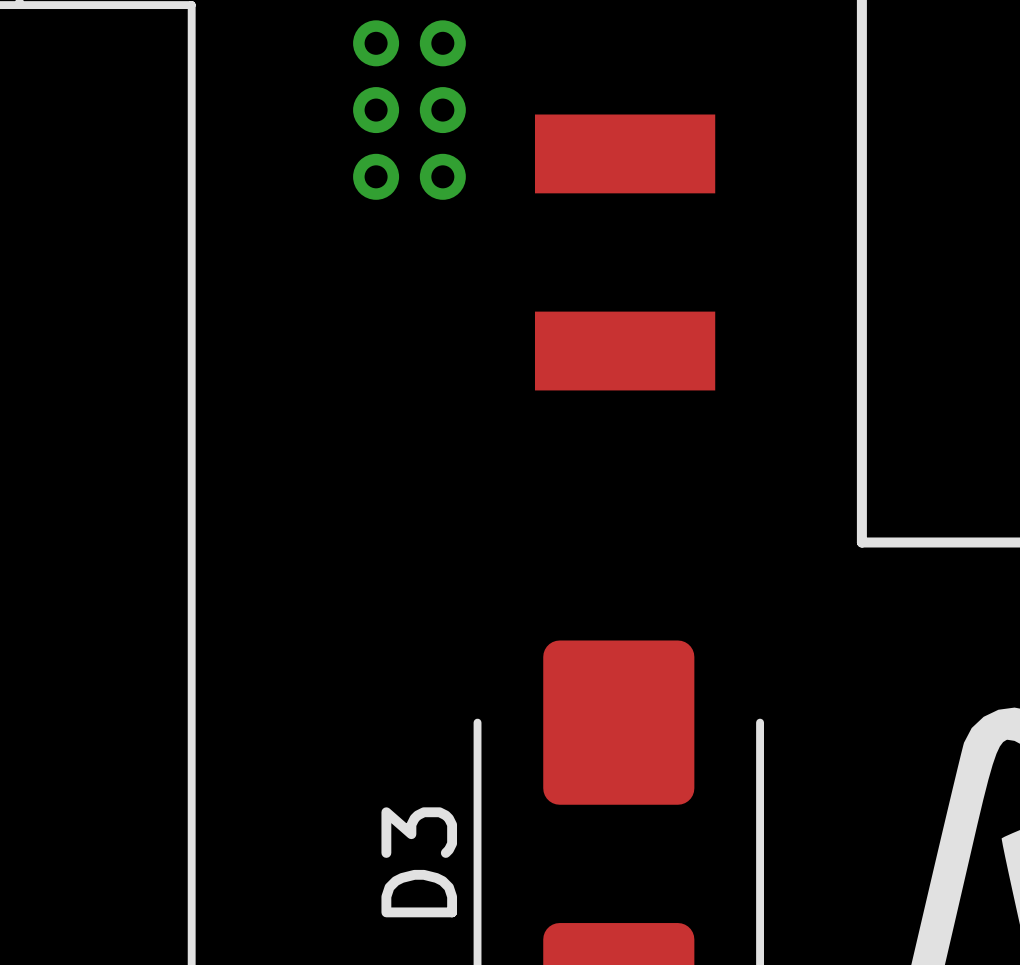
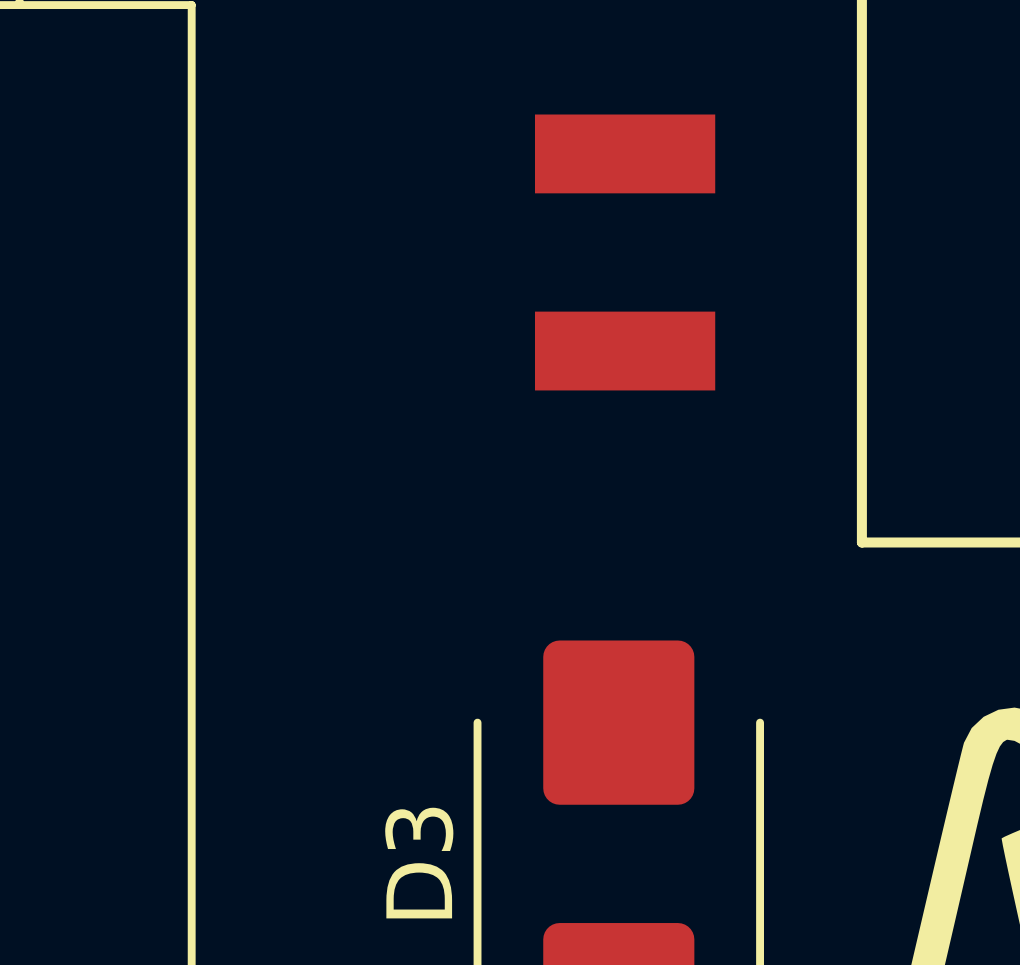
via: (376, 43) -> none
via: (442, 43) -> none
via: (376, 110) -> none
via: (442, 110) -> none
via: (376, 176) -> none
via: (442, 176) -> none

